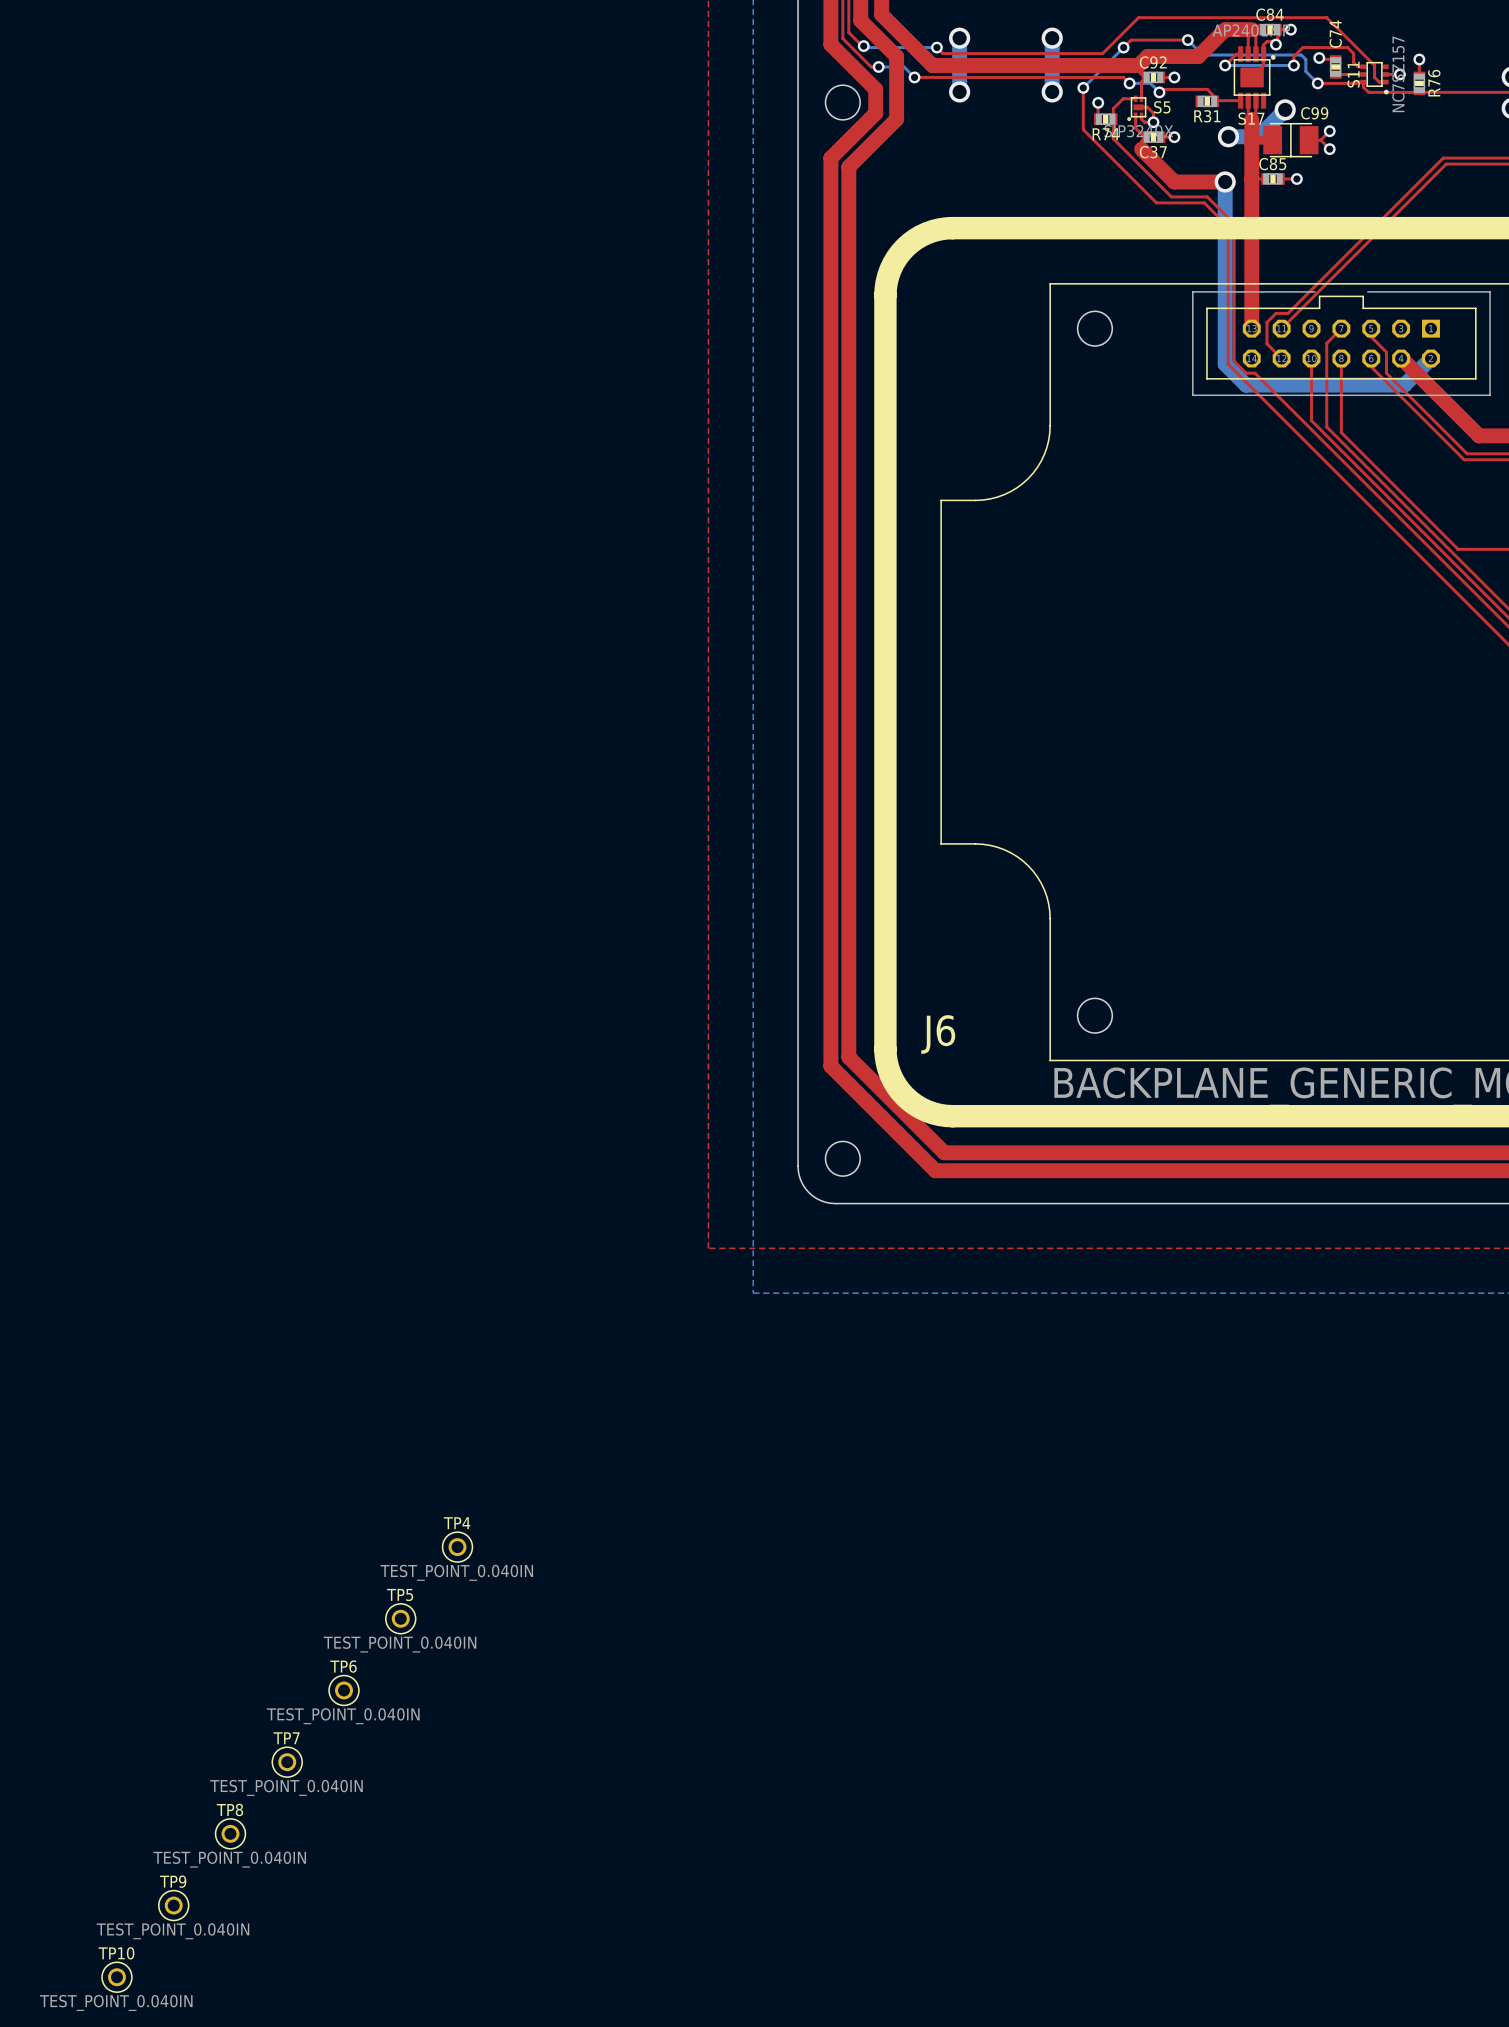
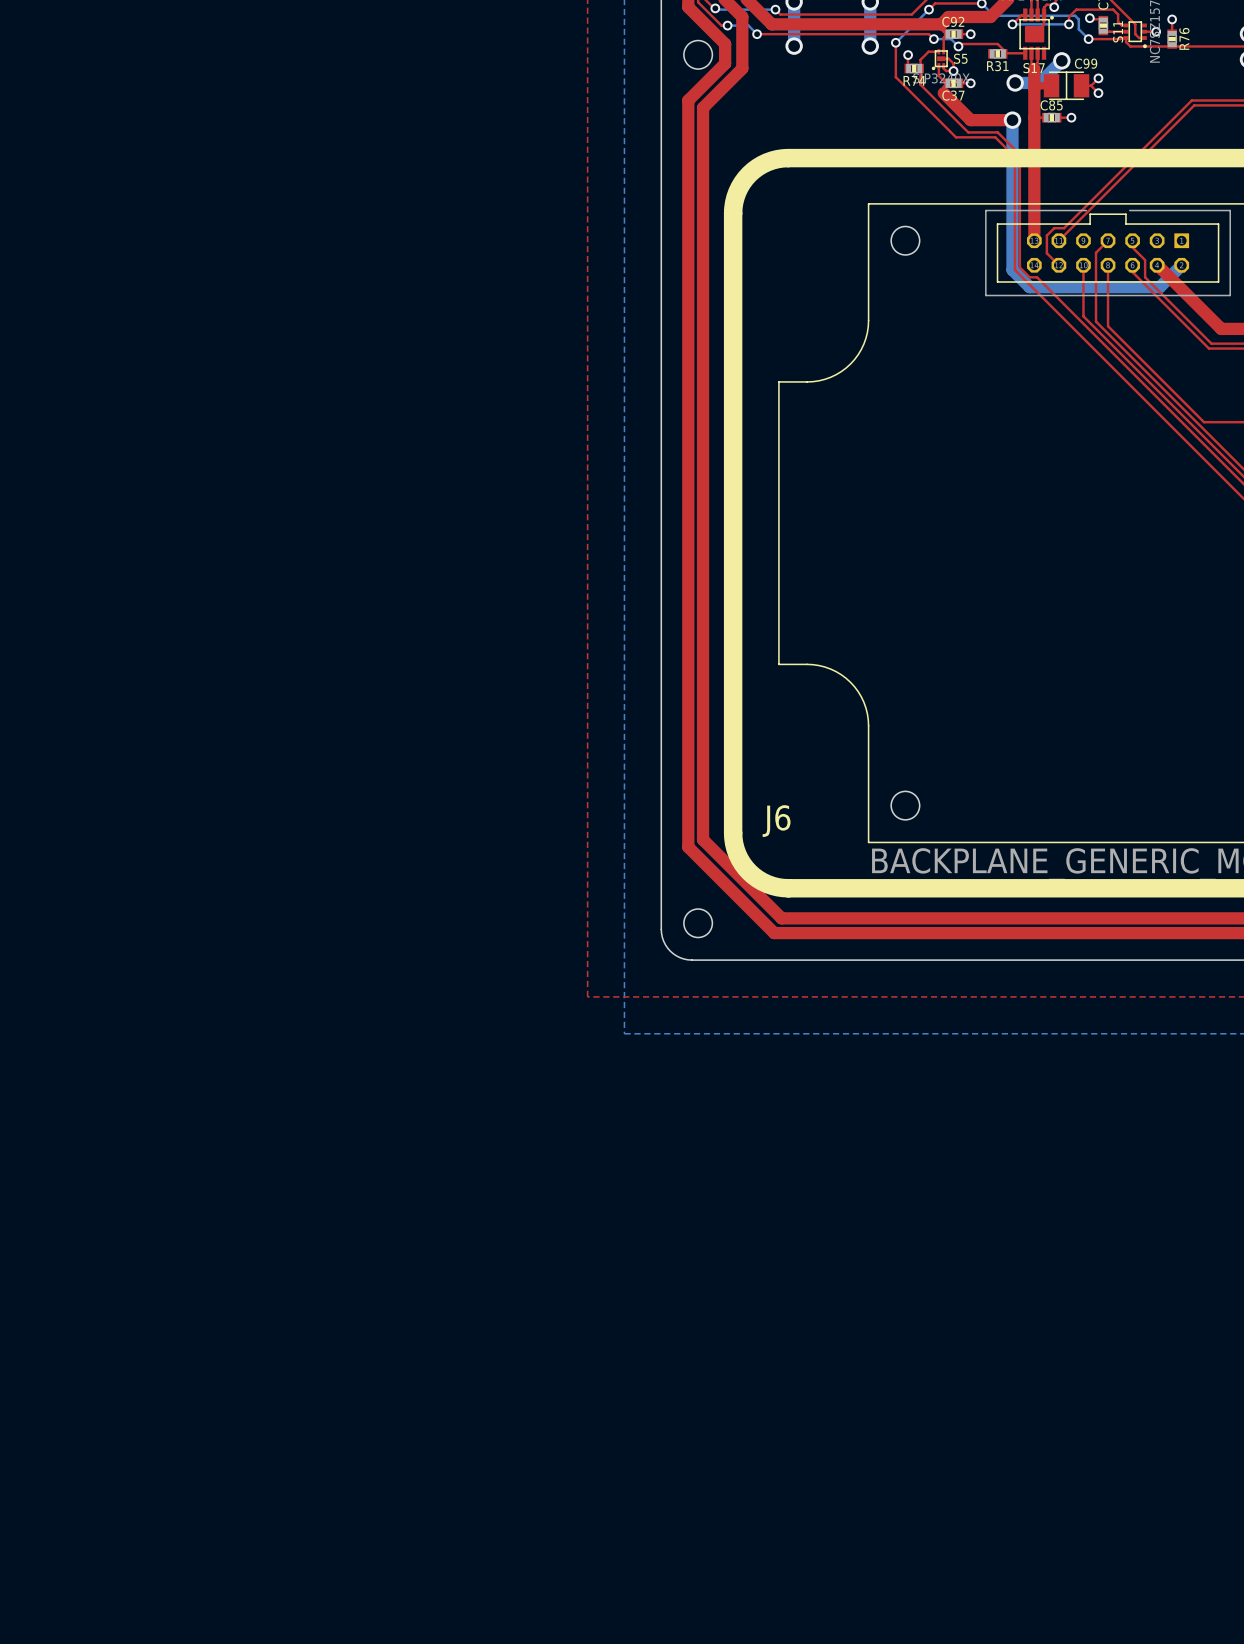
TP4: TEST_POINT_0.040IN (457, 1547) -> none
TP5: TEST_POINT_0.040IN (400, 1618) -> none
TP6: TEST_POINT_0.040IN (344, 1690) -> none
TP7: TEST_POINT_0.040IN (287, 1762) -> none
TP8: TEST_POINT_0.040IN (230, 1833) -> none
TP9: TEST_POINT_0.040IN (173, 1905) -> none
TP10: TEST_POINT_0.040IN (116, 1977) -> none

